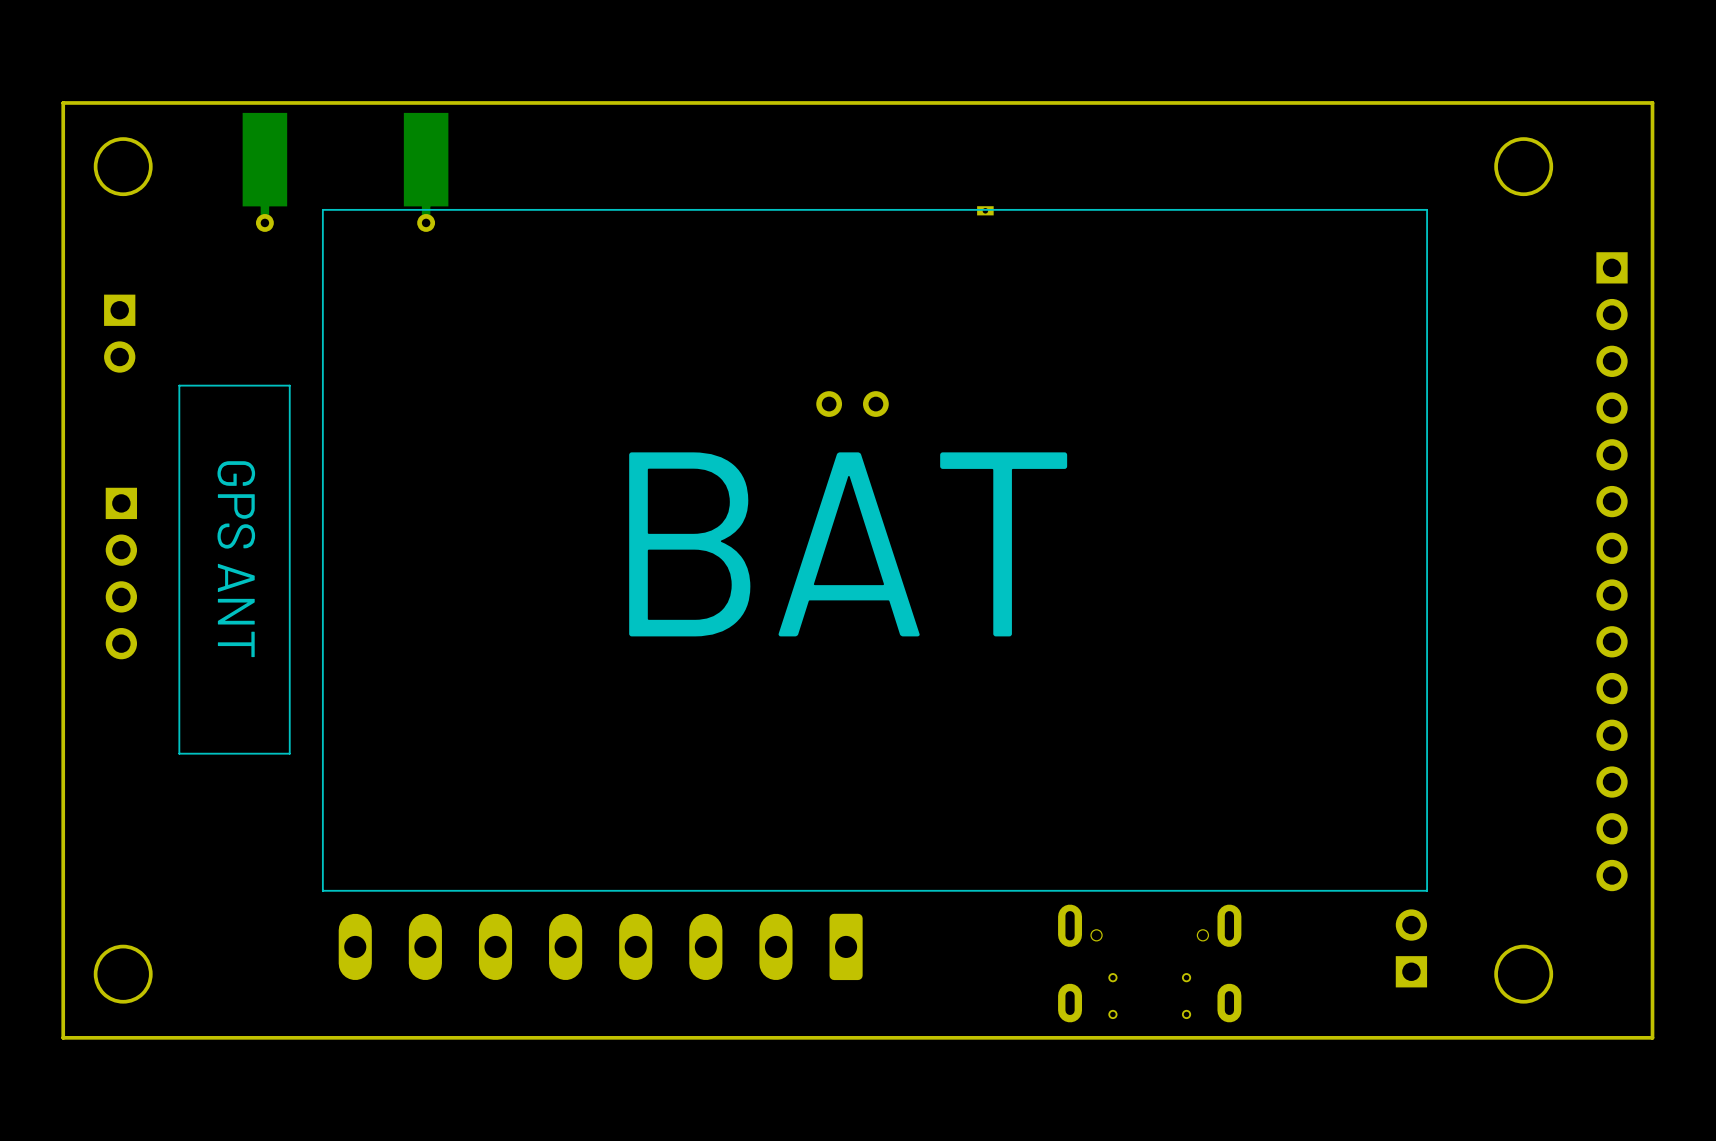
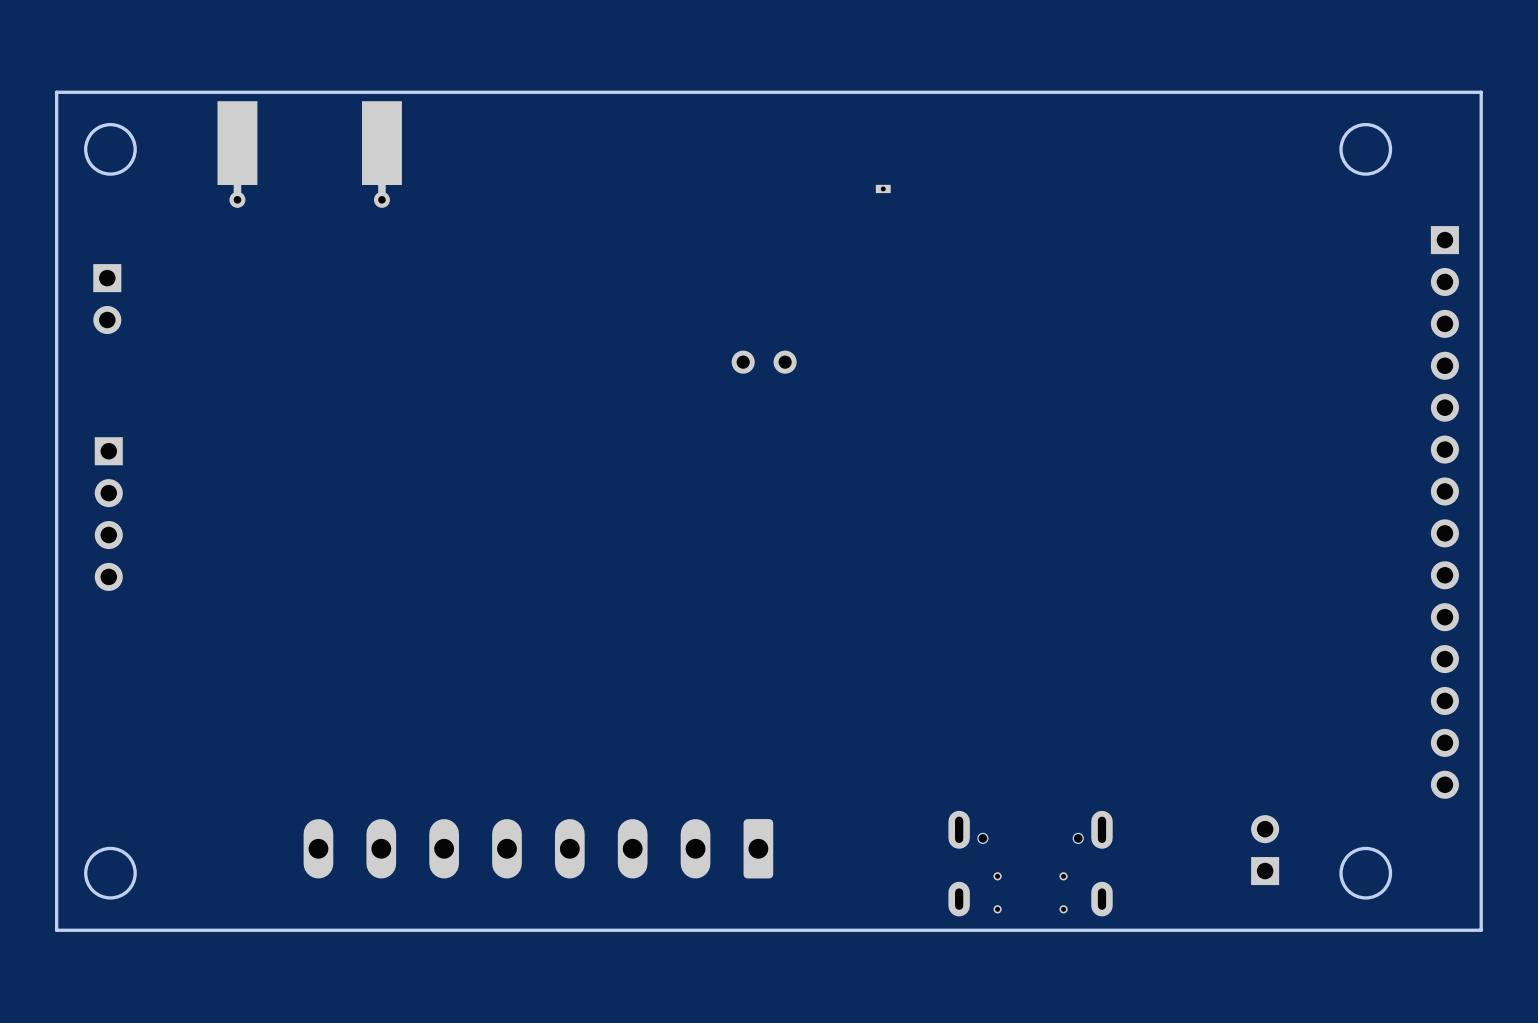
line: (1427, 209) (322, 209) (322, 890) (1427, 890) (1427, 209) -> none
line: (289, 385) (179, 385) (179, 753) (289, 753) (289, 385) -> none
text: BAT (848, 544) -> none
text: GPS ANT (236, 559) -> none

